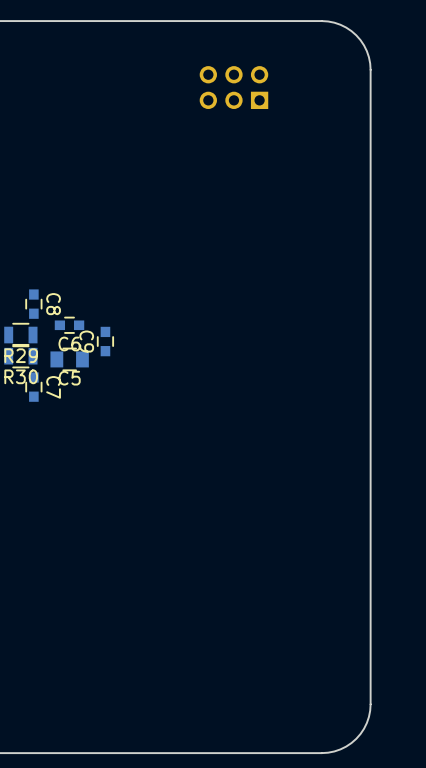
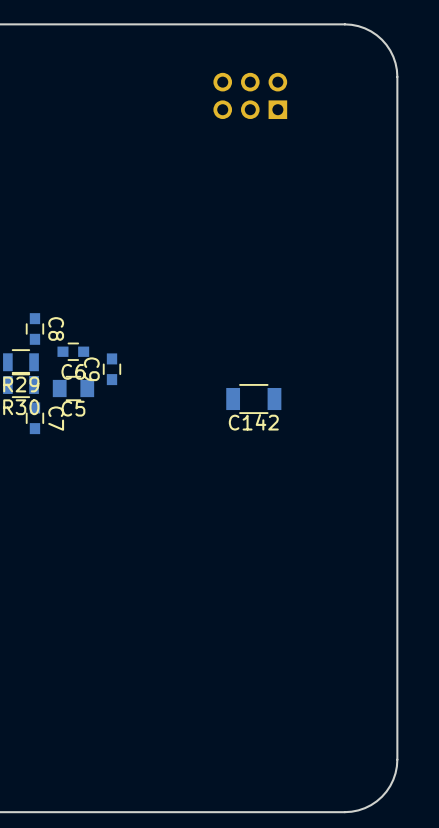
C142: none -> (253, 399)

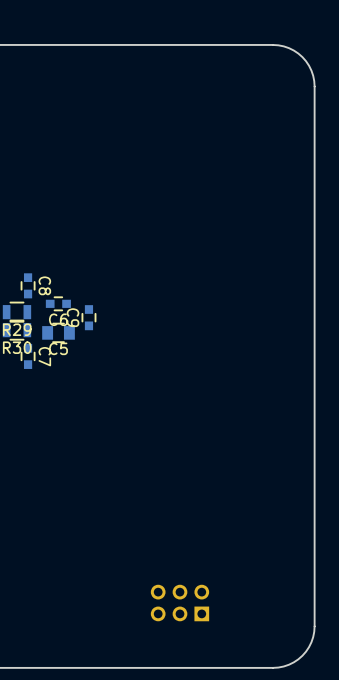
part: (250, 95) -> none
C142: (253, 399) -> none
part: none -> (179, 603)

